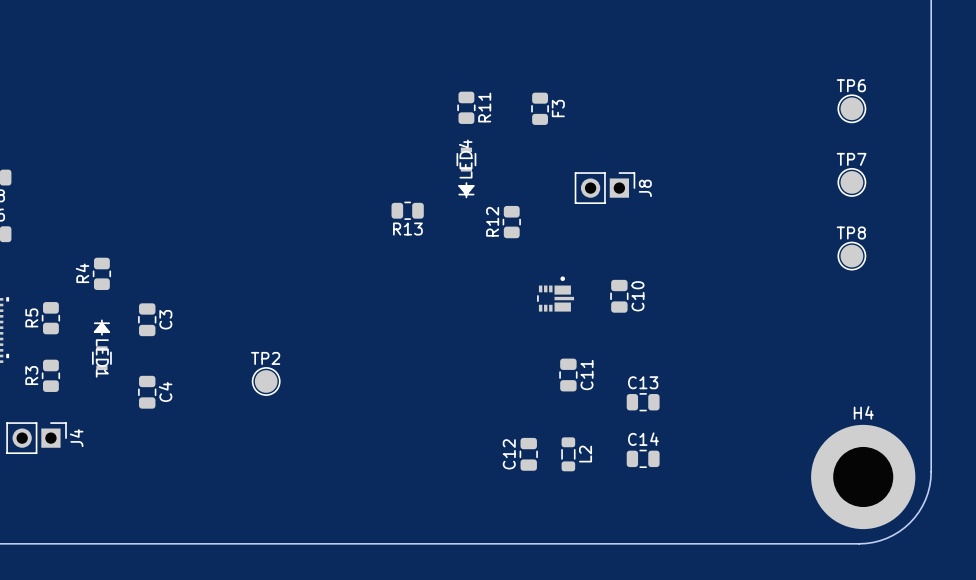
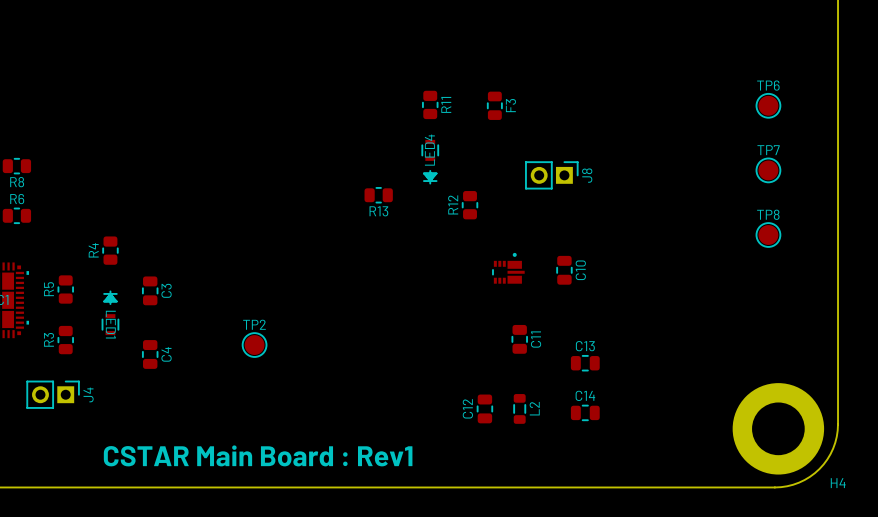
H4 name position: H4 (863, 412) -> H4 (838, 483)
text: none -> CSTAR Main Board : Rev1 (258, 455)

